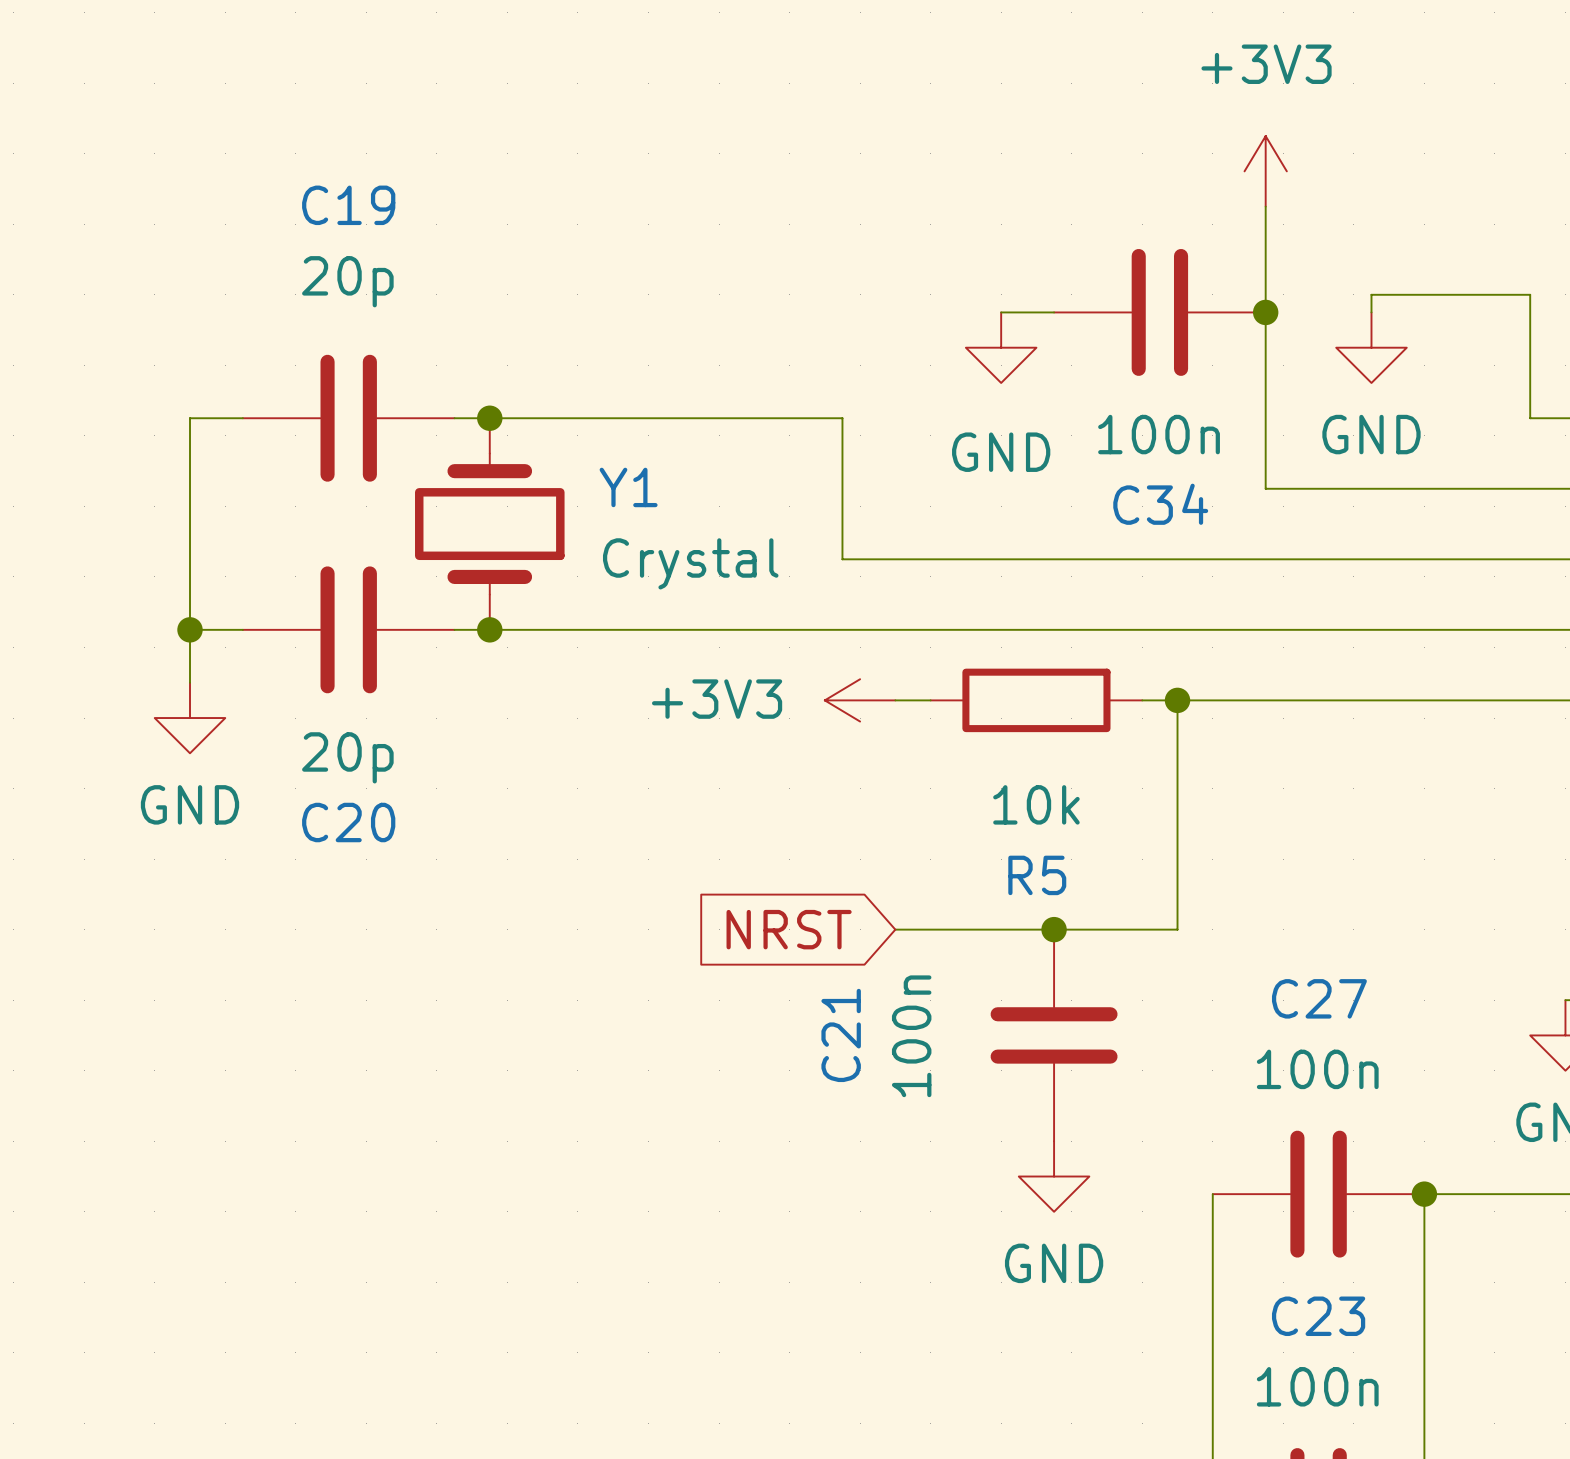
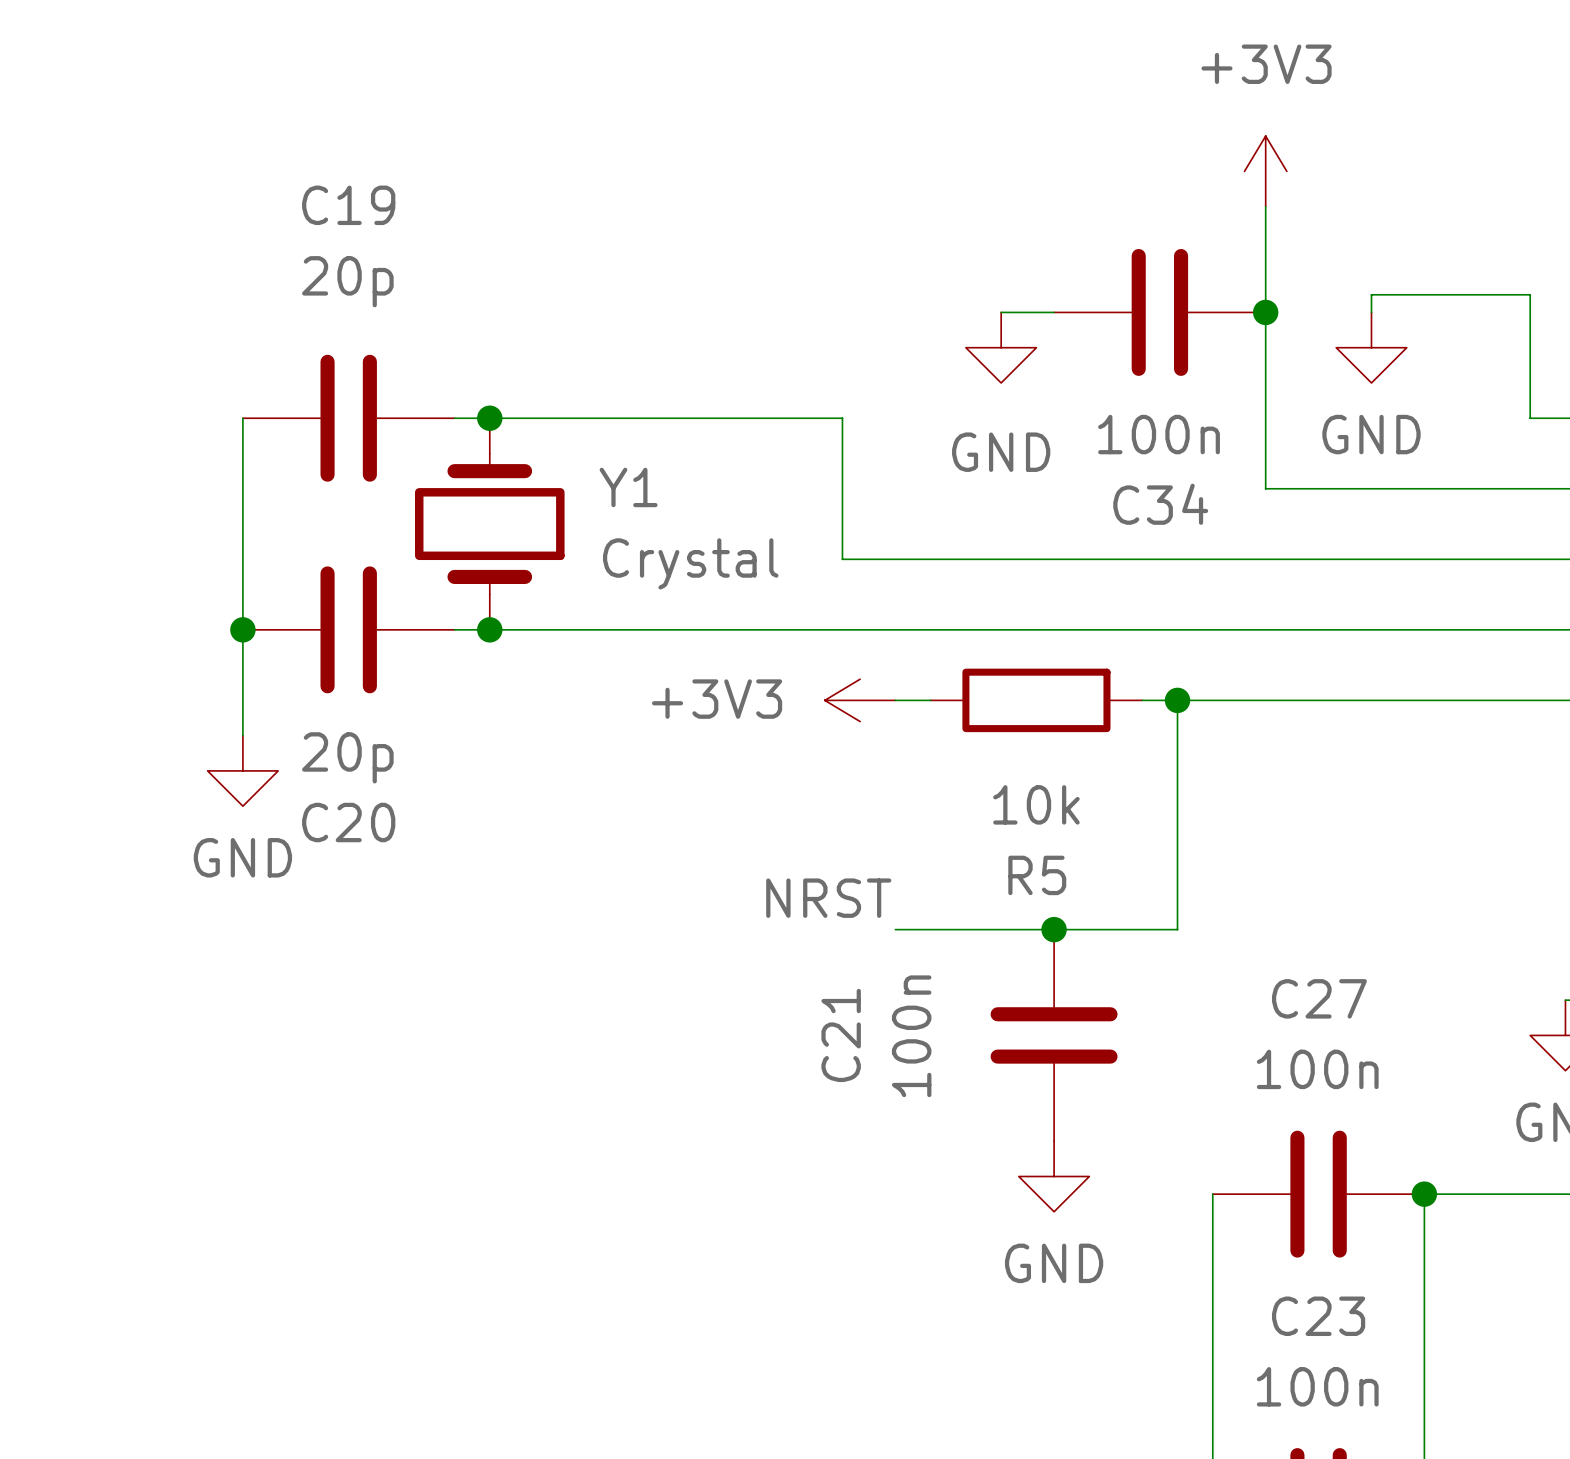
wire: (242, 418) (190, 418) (190, 682) -> (242, 418) (242, 735)
wire: (190, 629) (242, 629) -> none
junction position: (190, 629) -> (242, 629)
power symbol position: GND (190, 718) -> GND (242, 770)
label: none -> NRST (828, 898)
global label: NRST (789, 929) -> none

